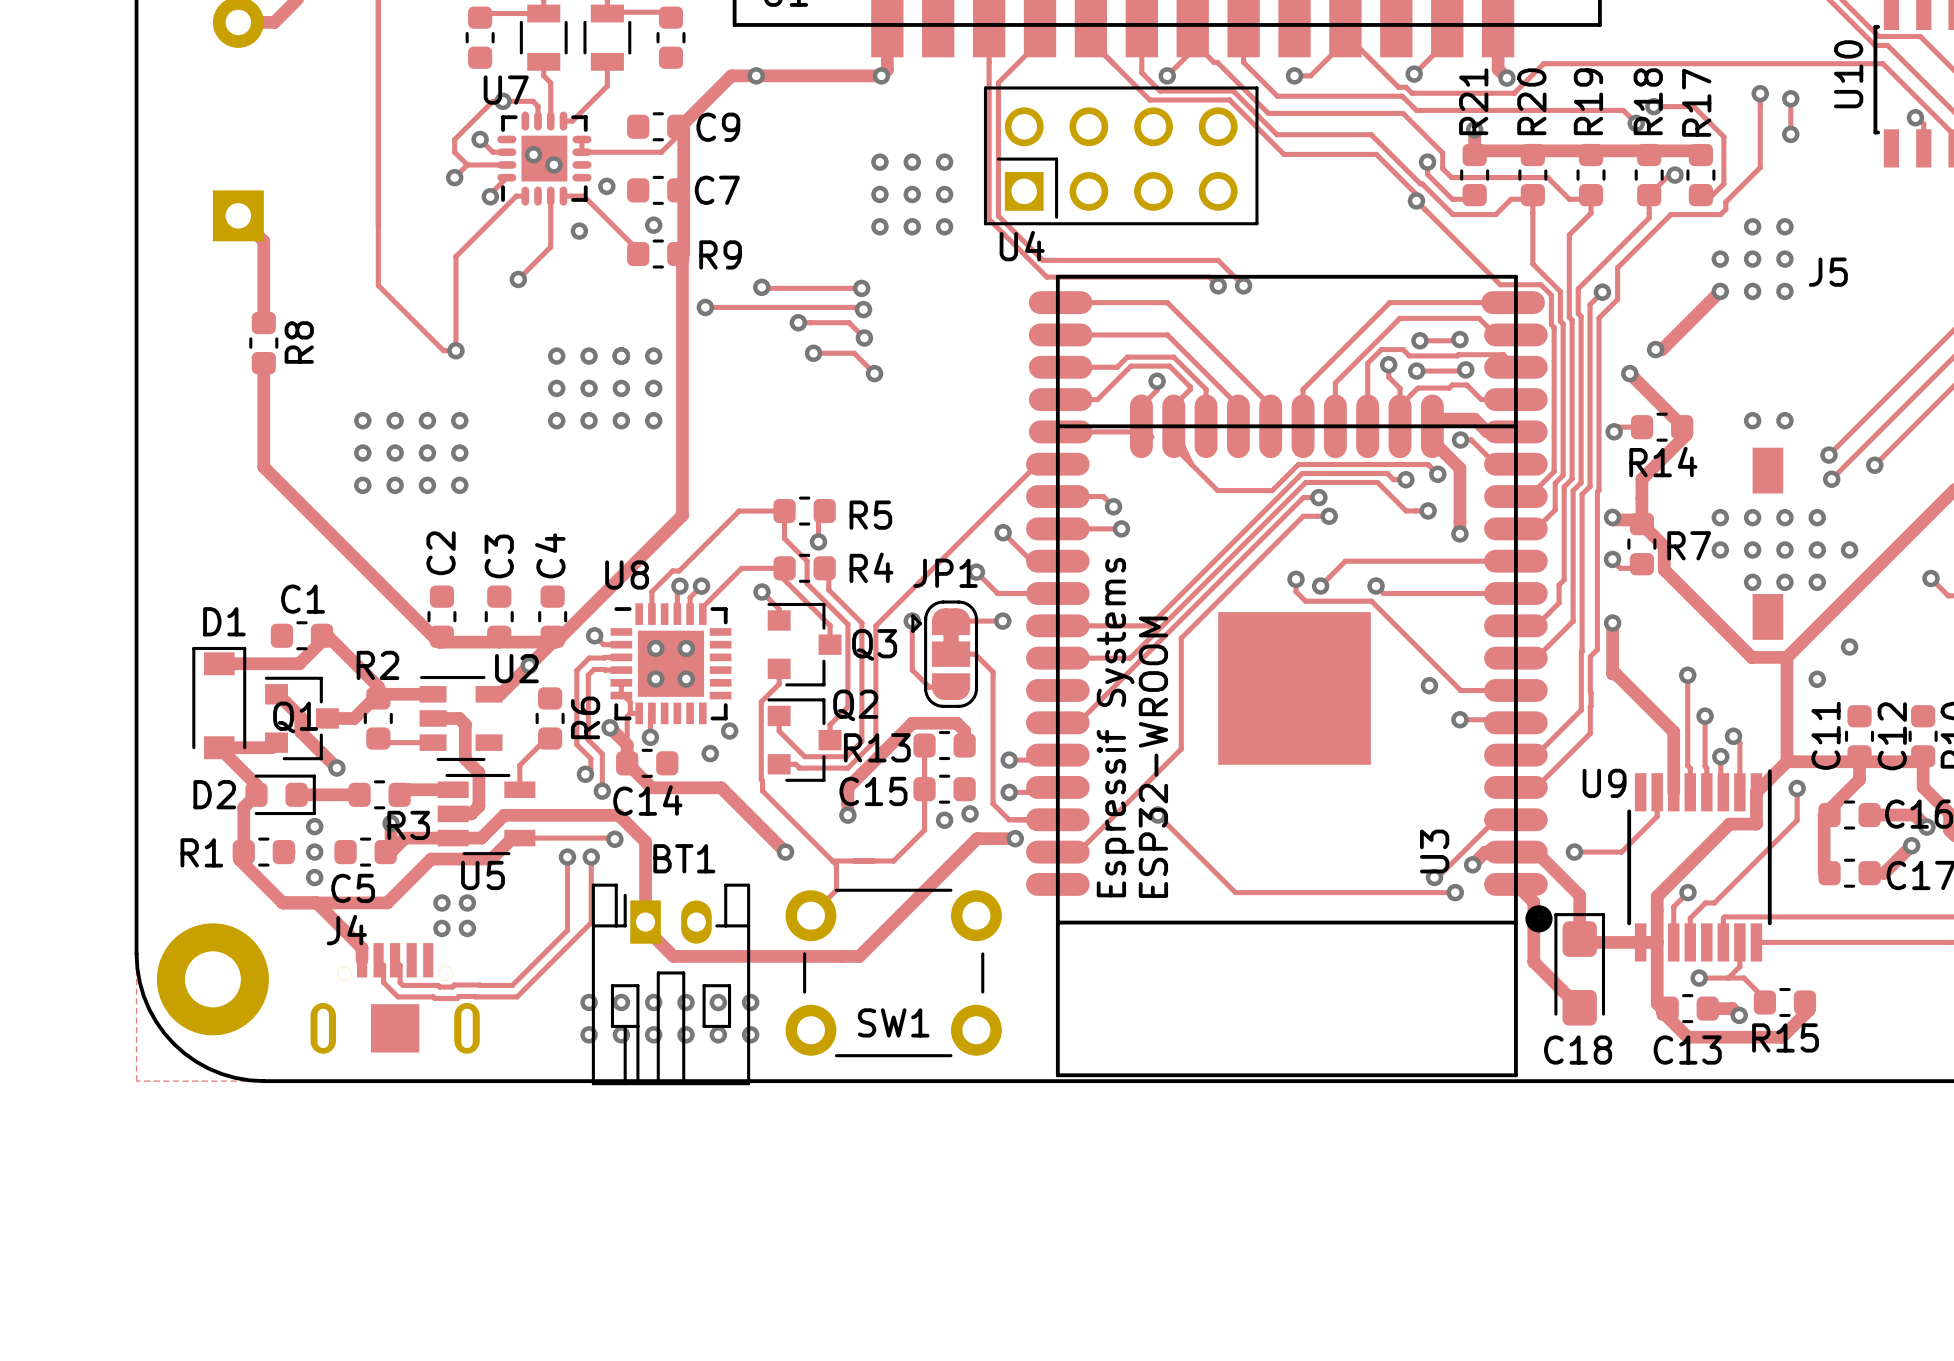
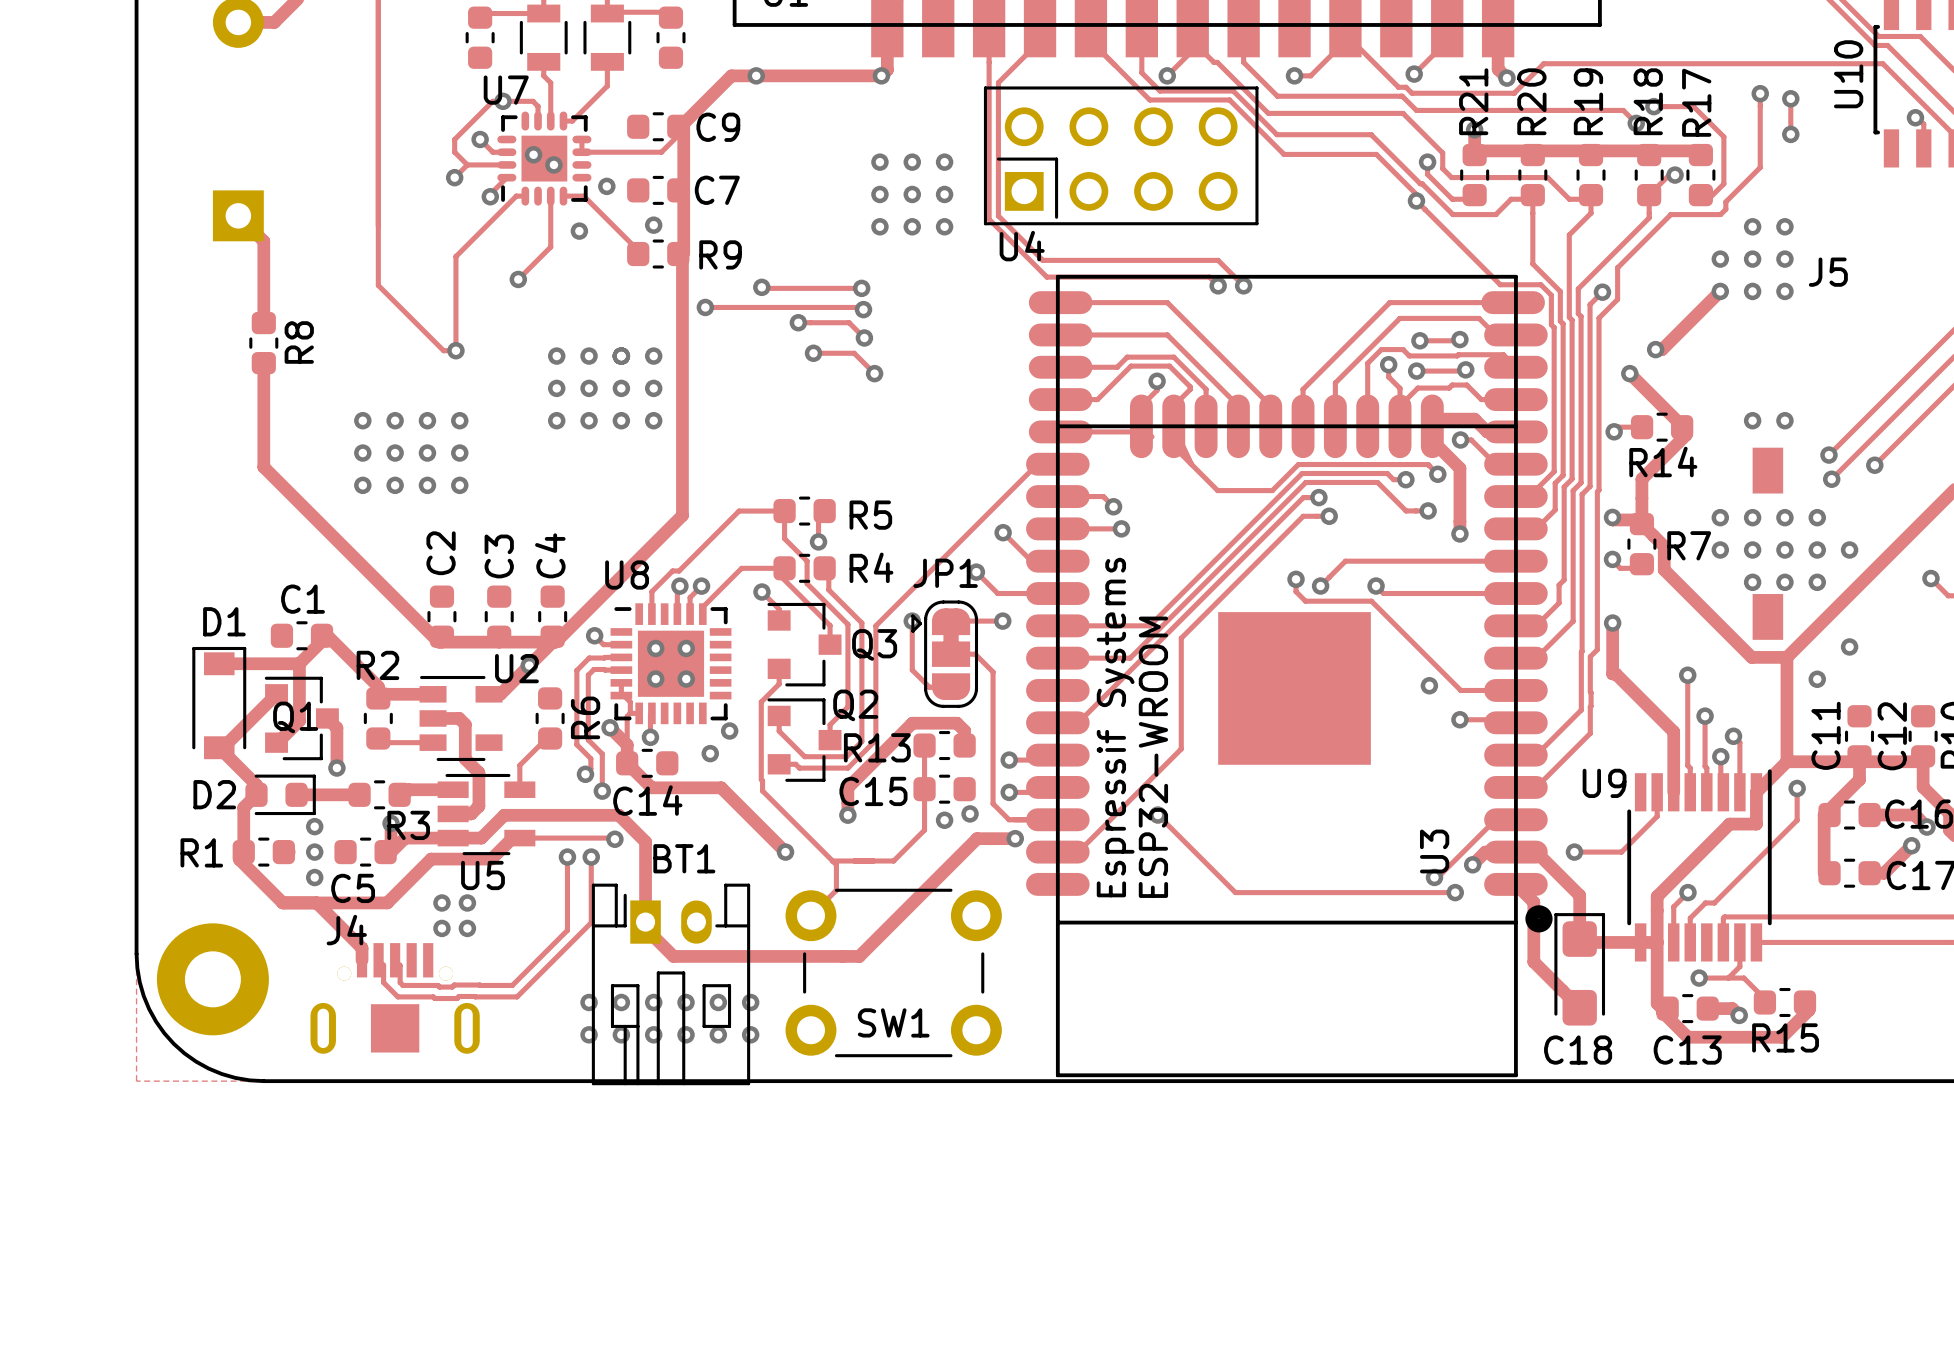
track: none -> (299, 663) (299, 721) (276, 742)
track: (276, 694) (300, 717) (300, 731) (336, 768) -> (327, 718) (336, 727) (336, 768)
track: (378, 694) (354, 718) (327, 718) -> none
track: (276, 742) (271, 747) (223, 747) -> (276, 694) (223, 747)

